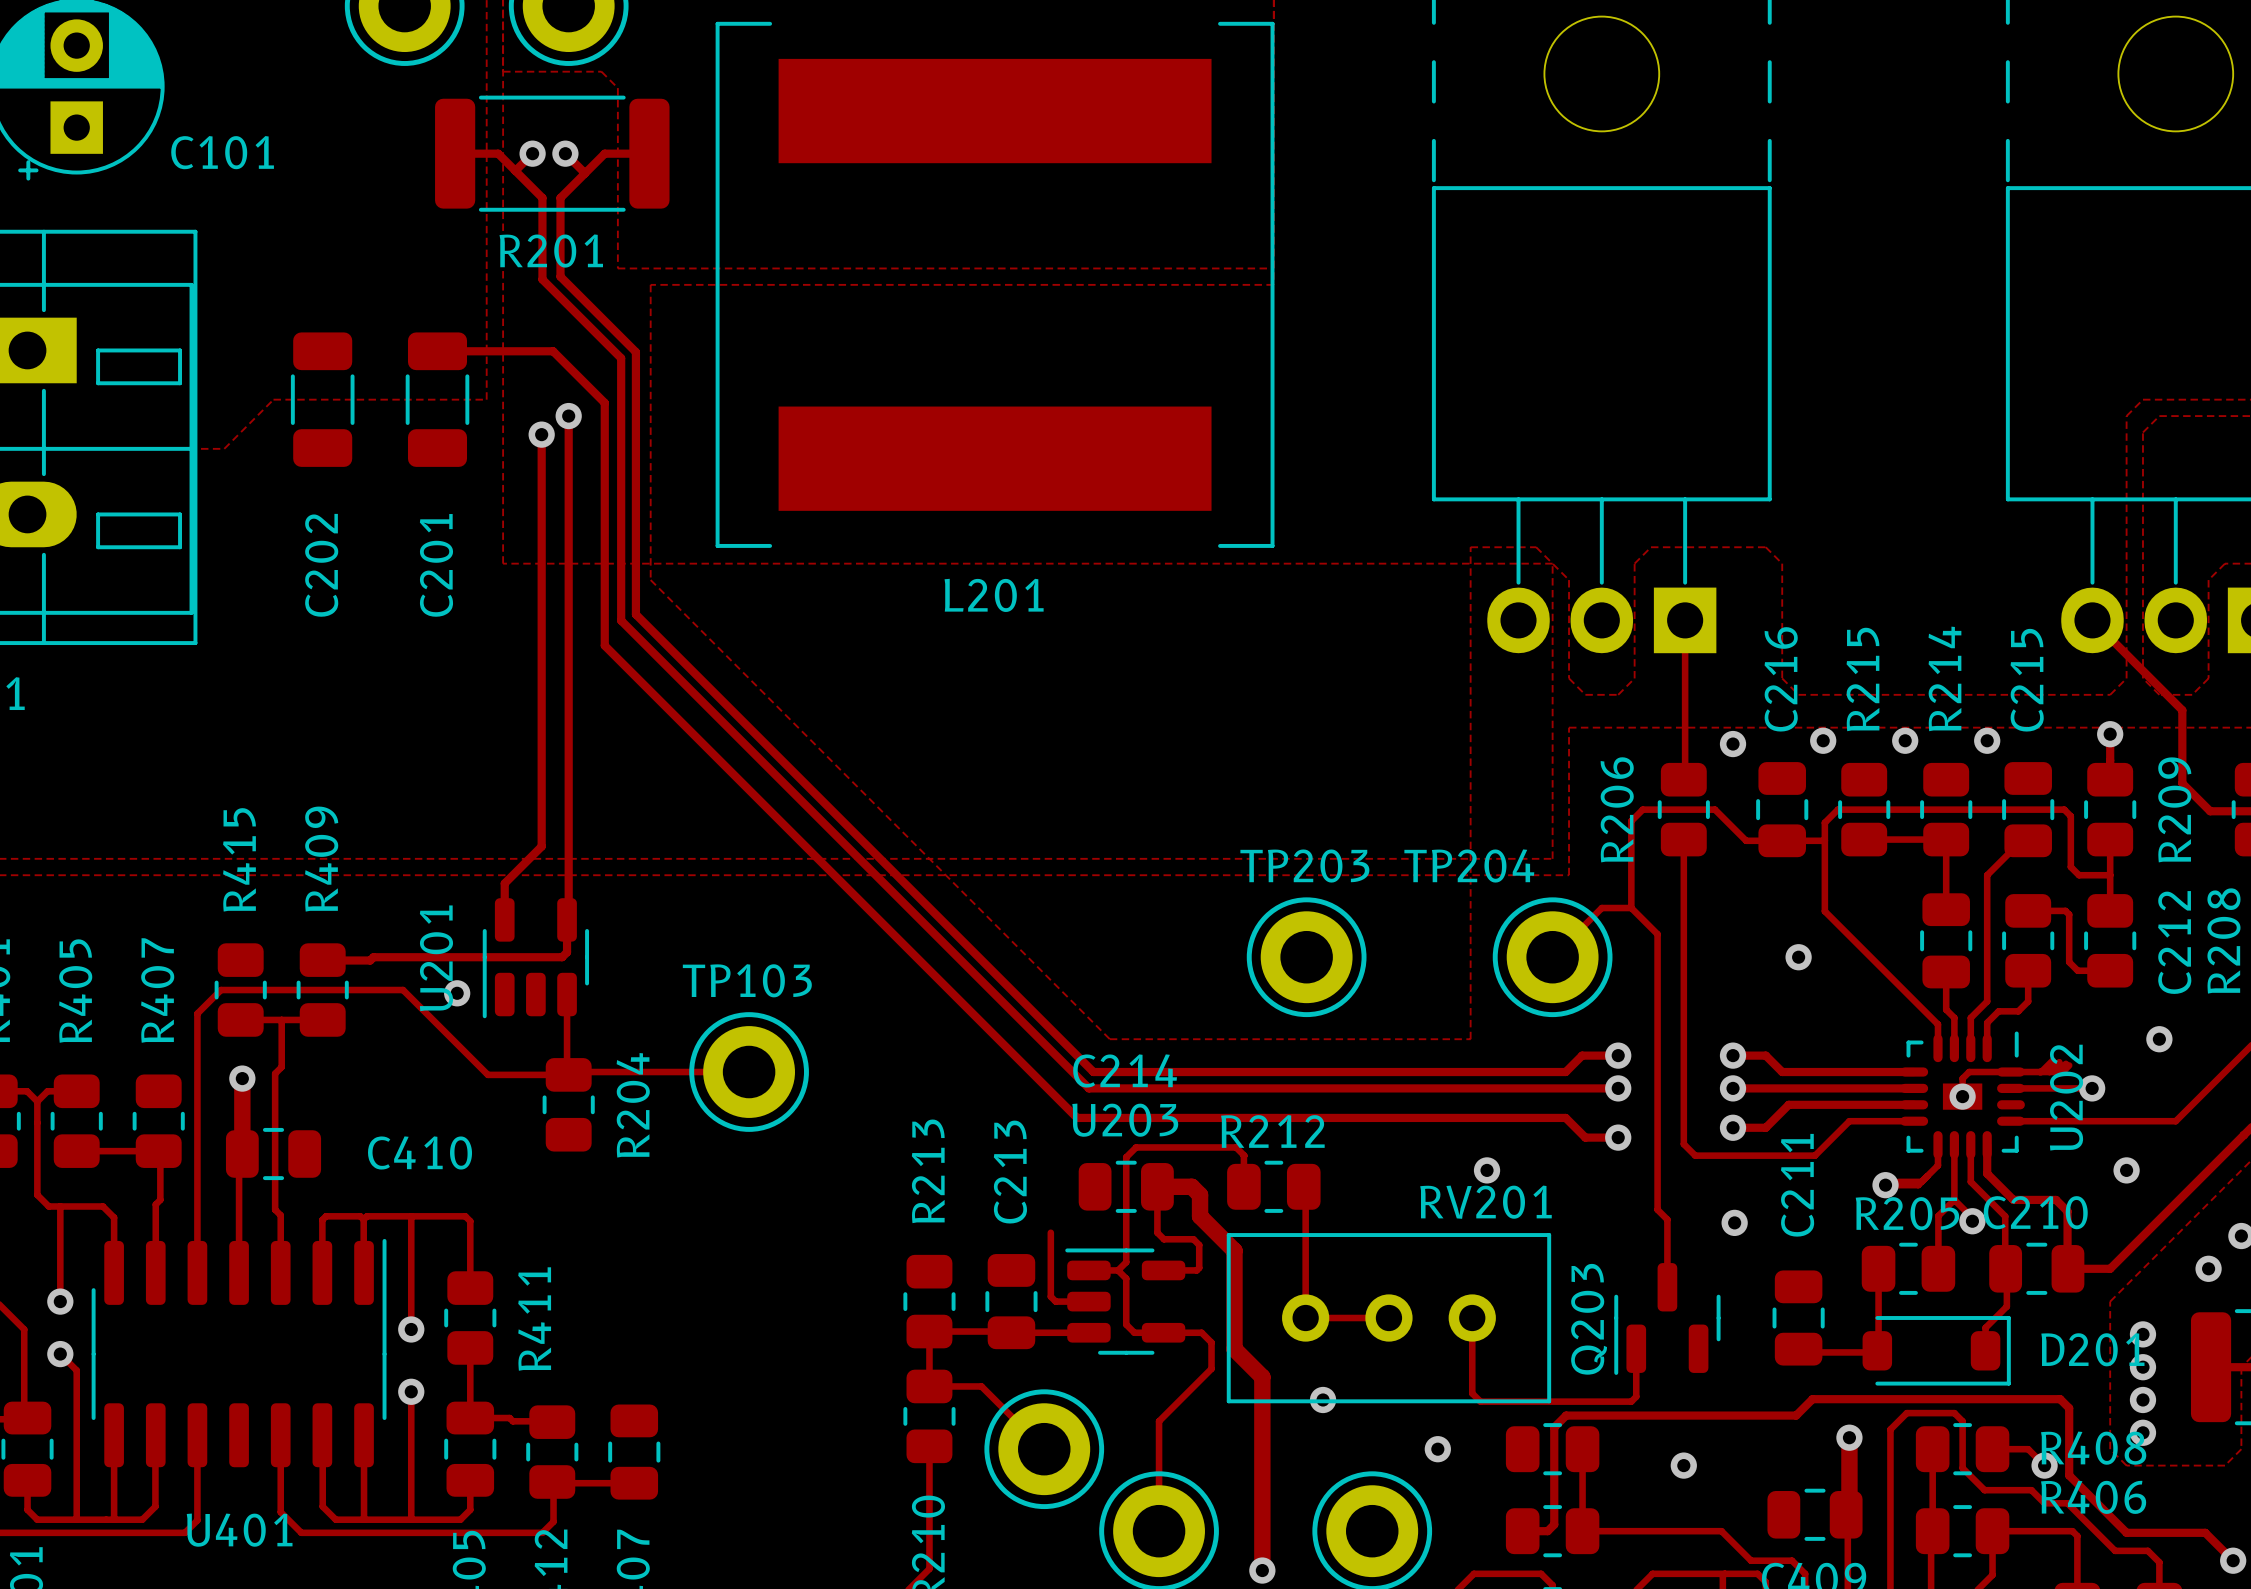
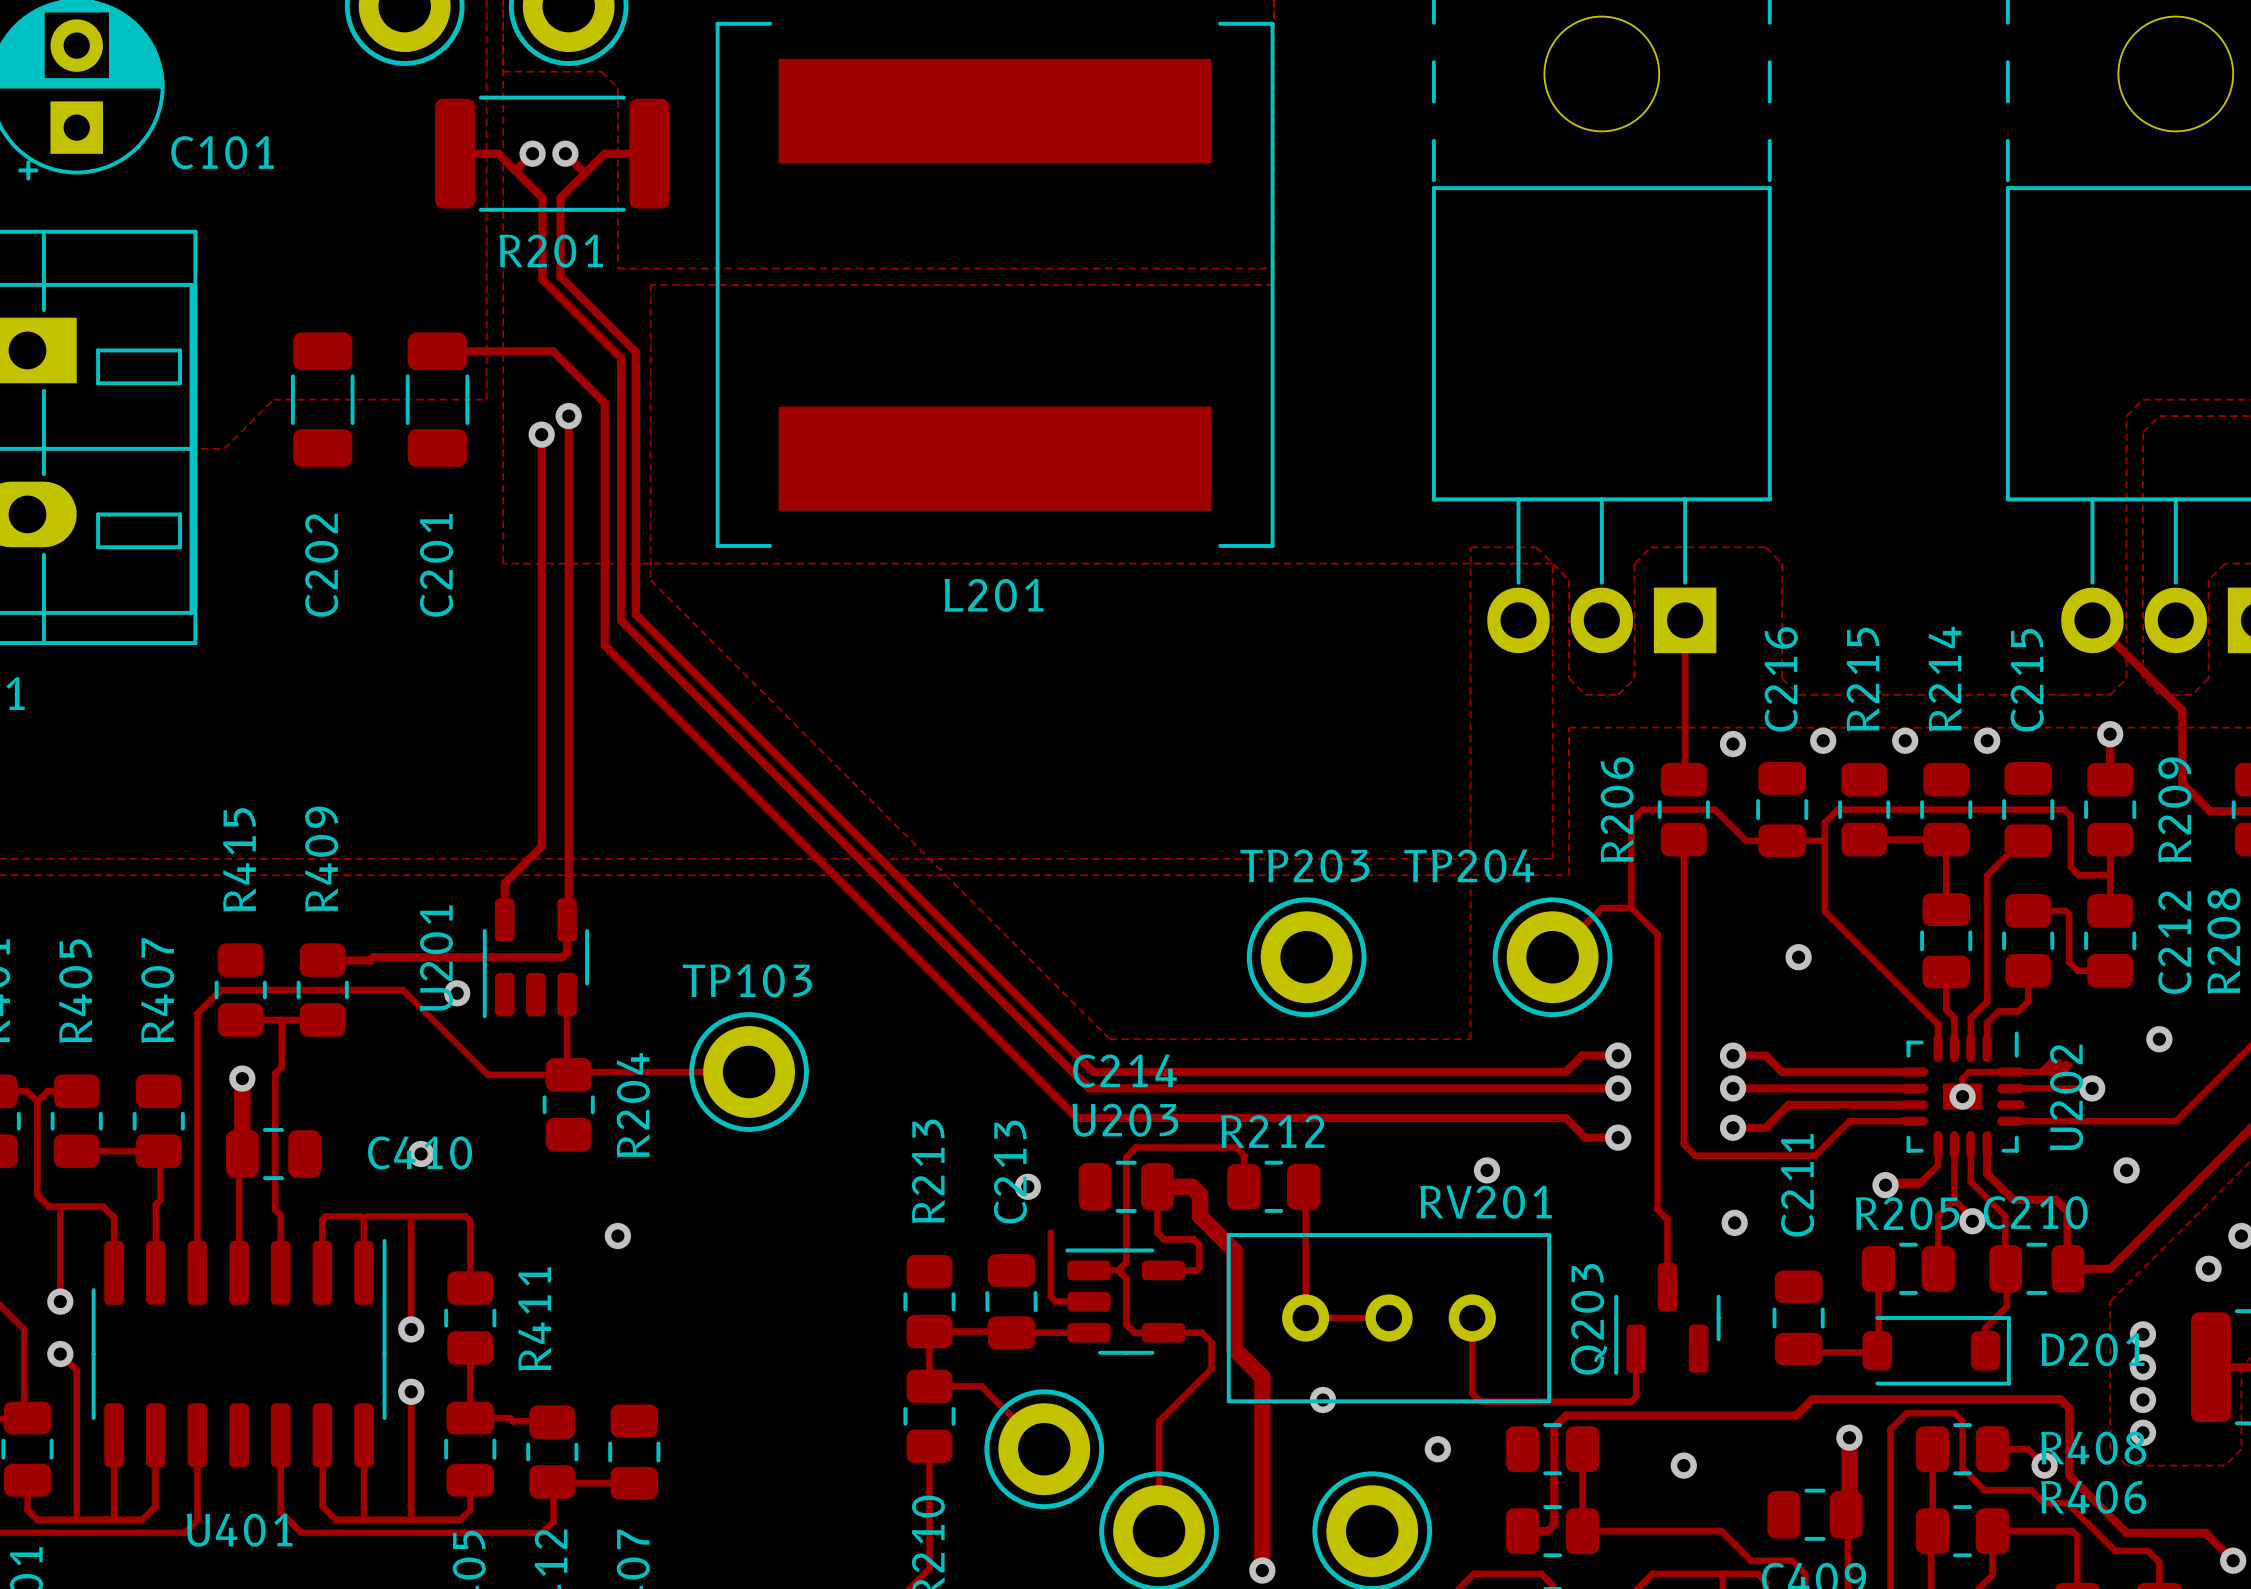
via: none -> (421, 1154)
via: none -> (1027, 1186)
via: none -> (617, 1236)

